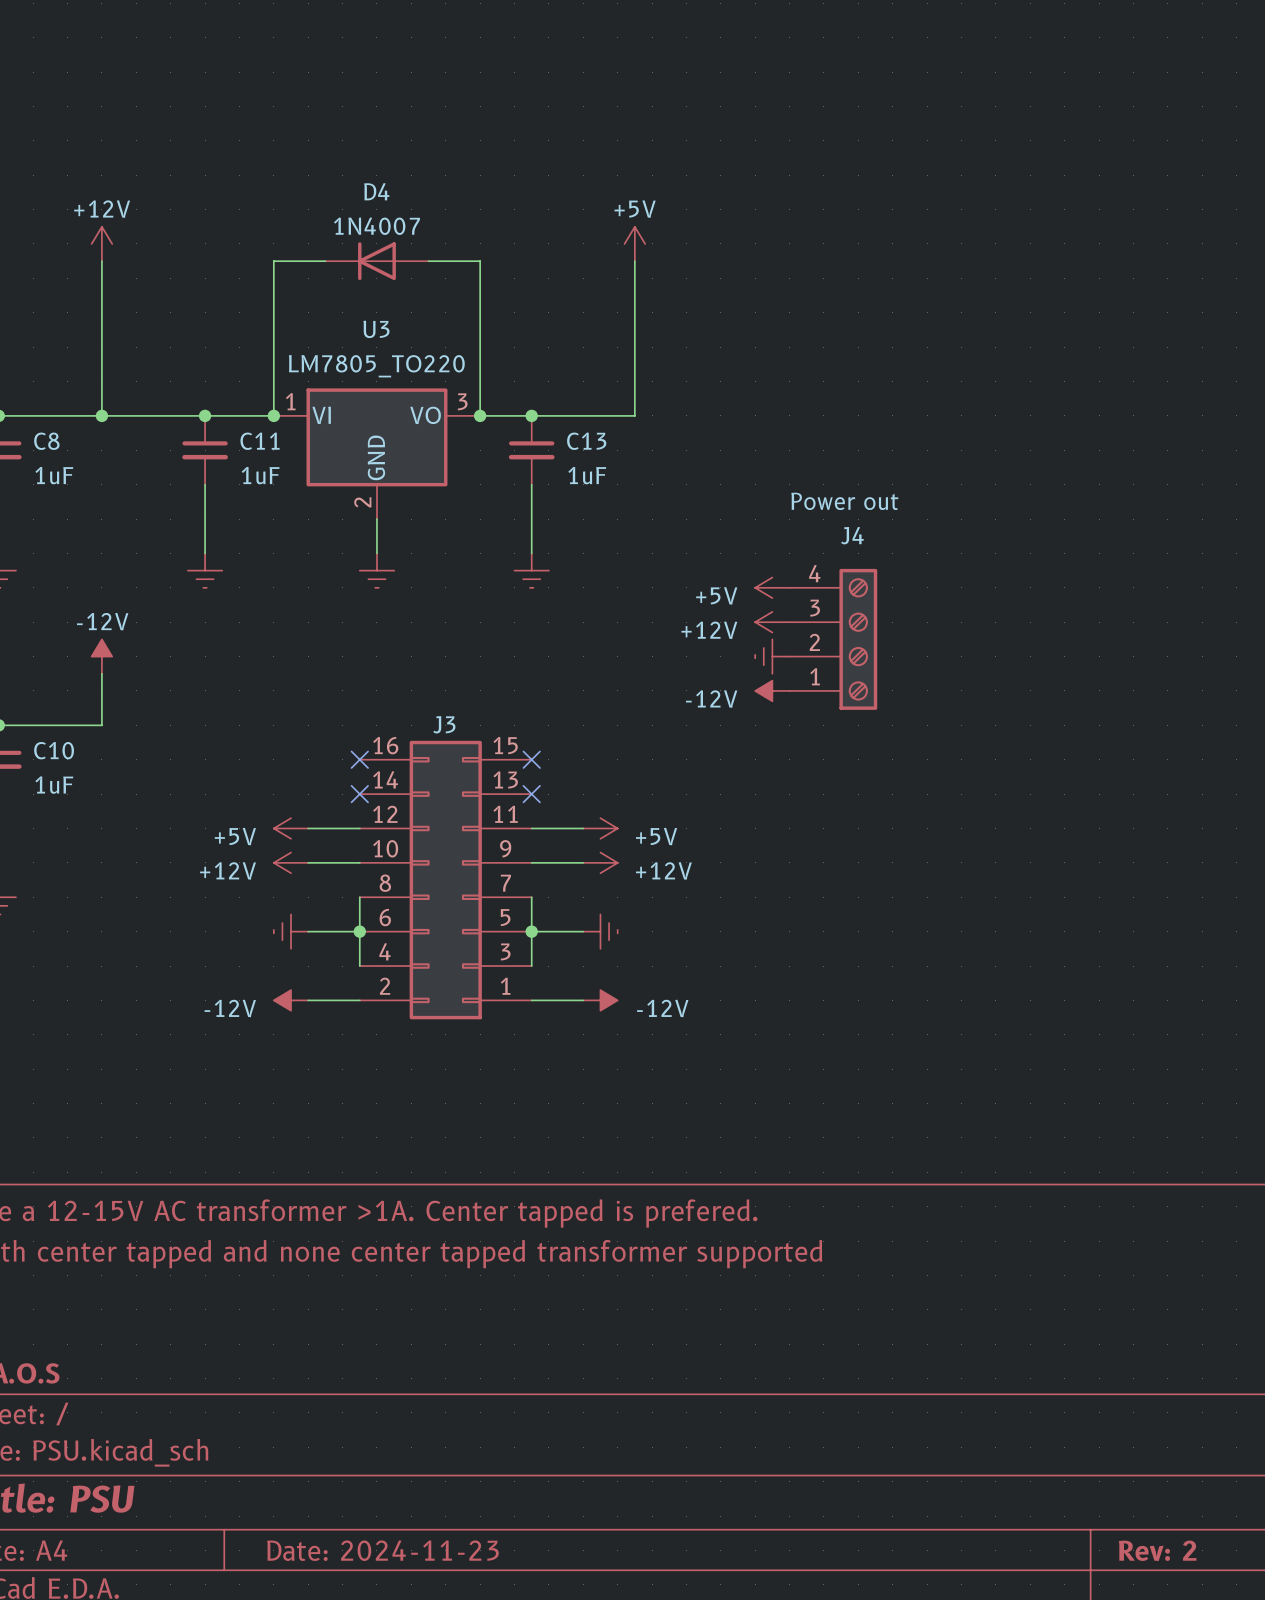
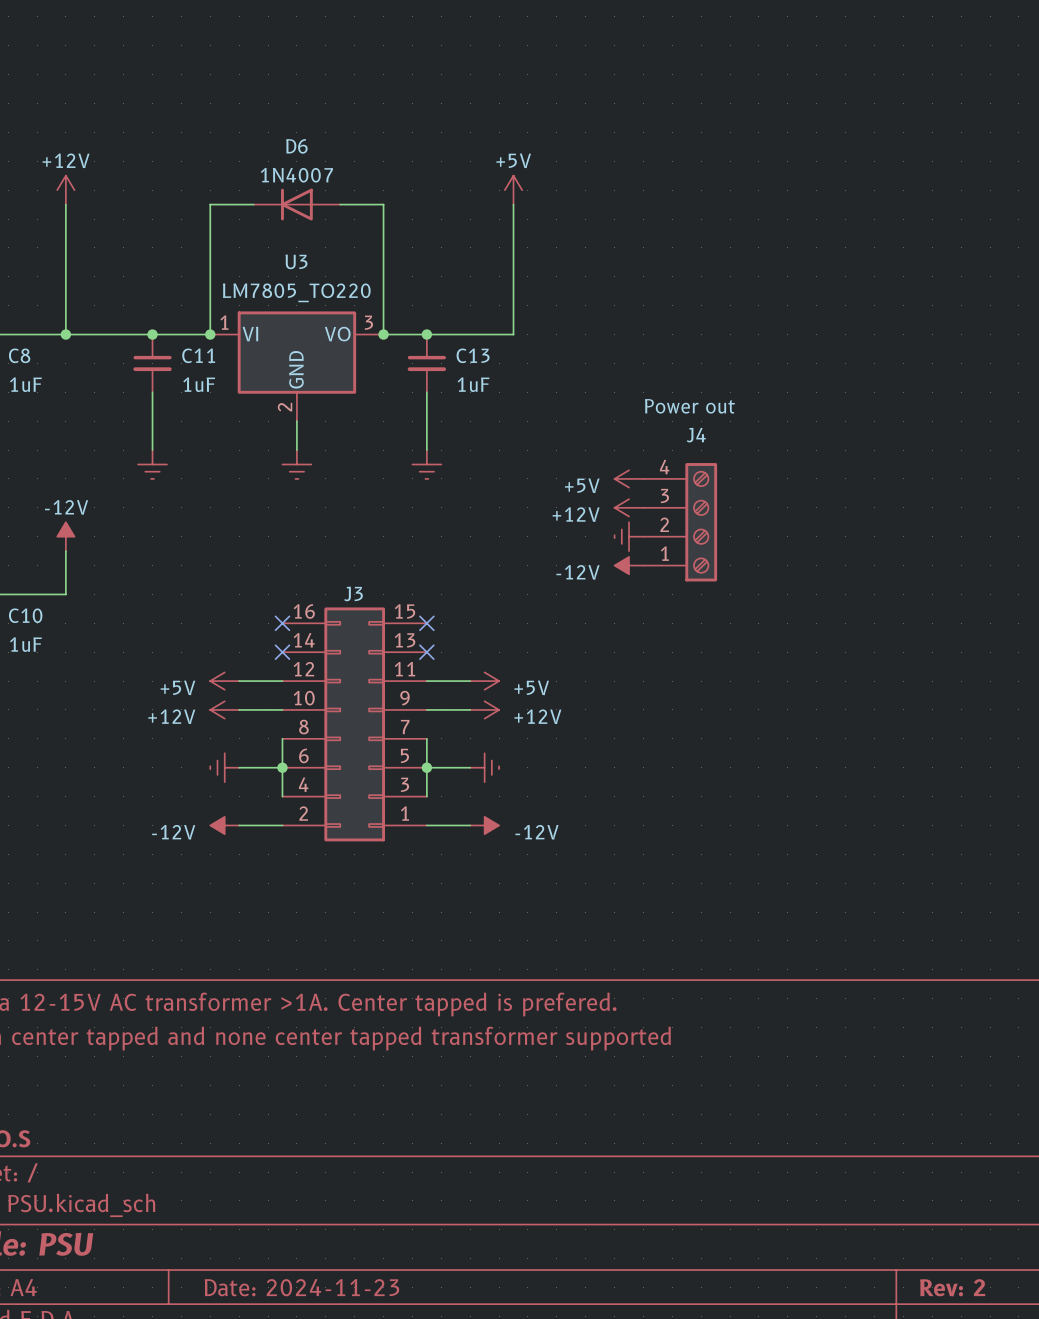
D4 name: D4 (376, 191) -> D6 (296, 146)

